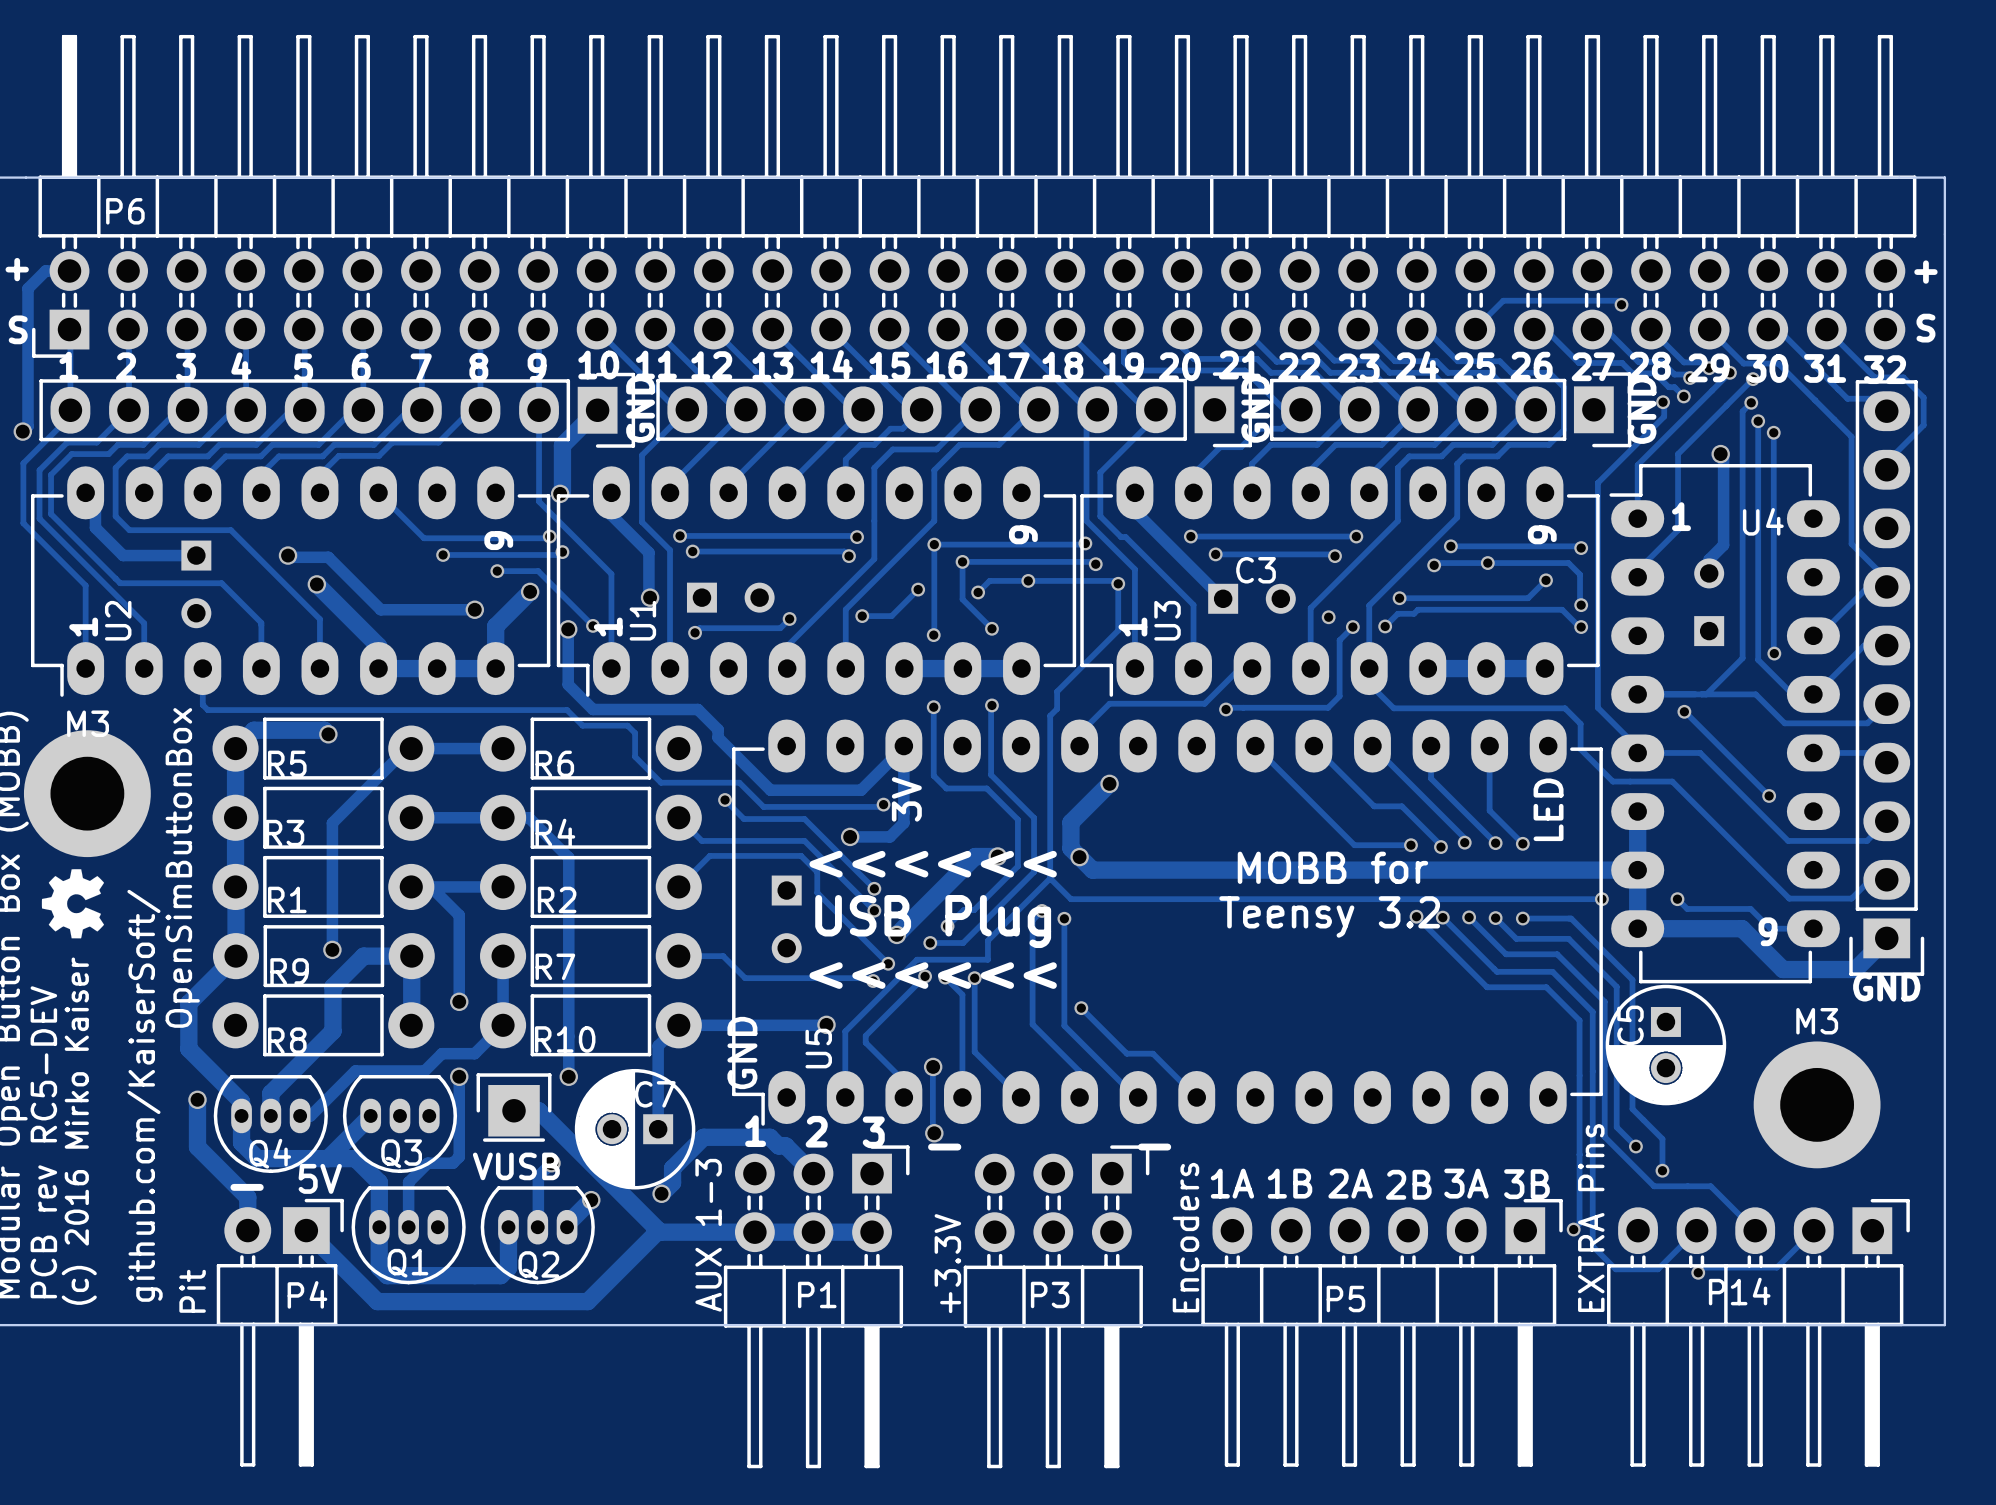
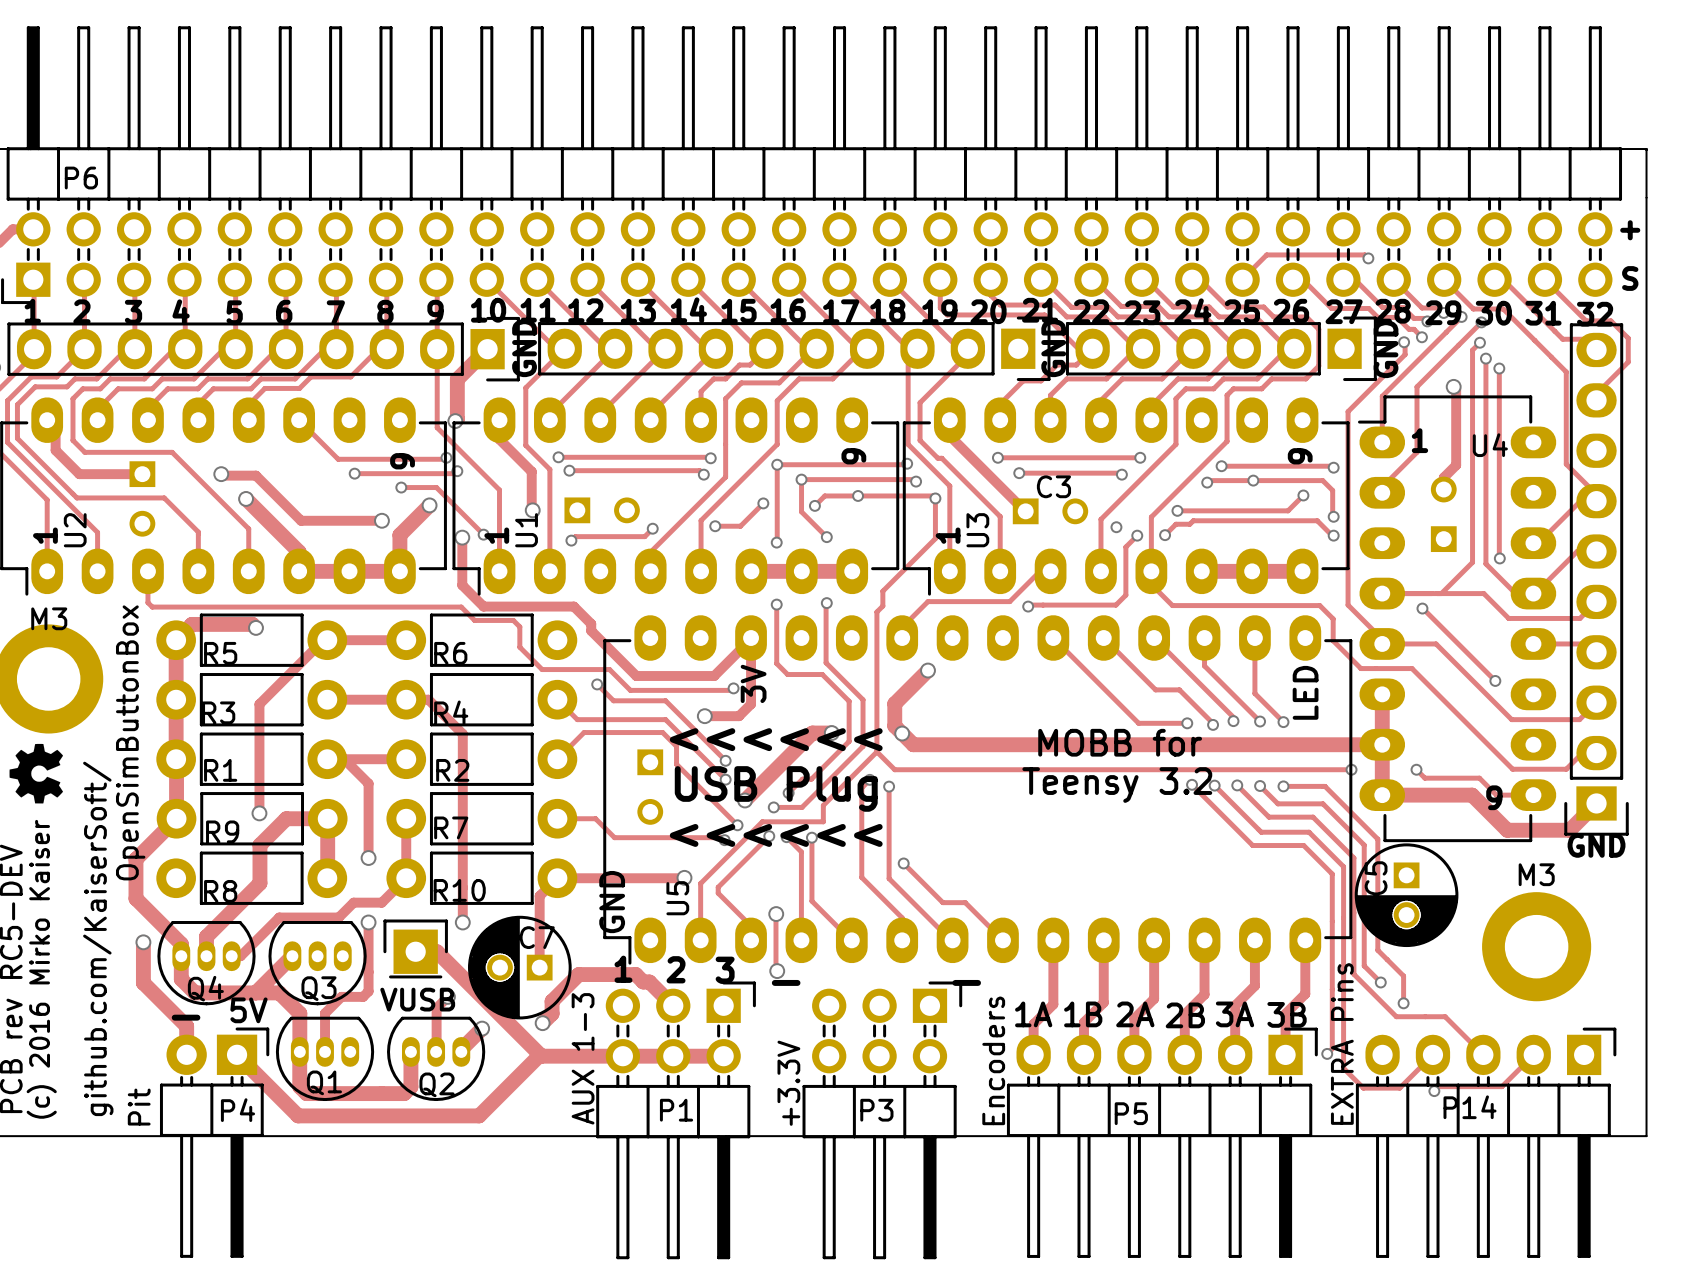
track: none -> (1053, 940) (1053, 1004) (1033, 1024) (1033, 1054)
track: none -> (1103, 940) (1103, 1002) (1084, 1022) (1084, 1054)
track: none -> (1154, 940) (1154, 998) (1134, 1018) (1134, 1054)
track: none -> (1204, 940) (1204, 994) (1184, 1014) (1184, 1054)
track: none -> (1254, 940) (1254, 985) (1235, 1005) (1235, 1054)
track: none -> (1305, 940) (1305, 994) (1285, 1013) (1285, 1054)

